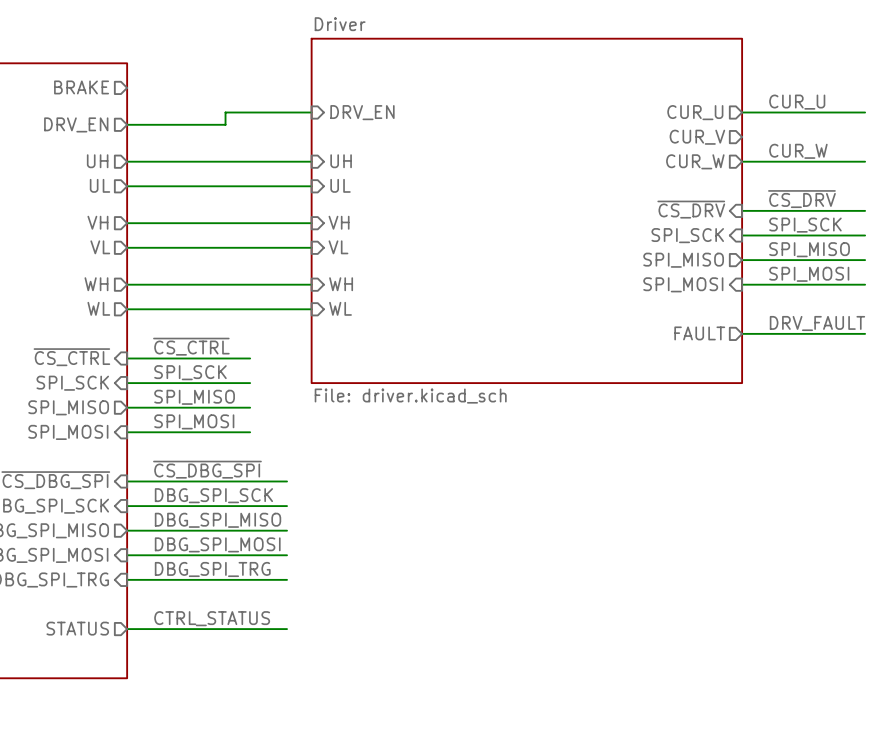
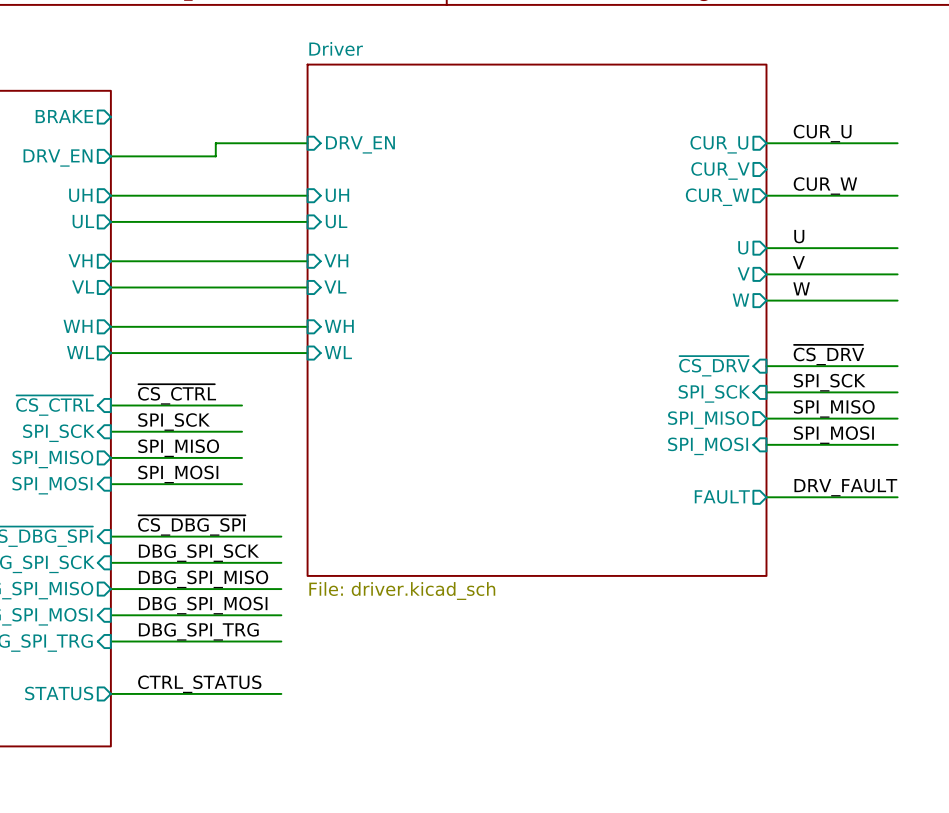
label: ~{CS_DRV} (801, 199) -> U (799, 236)
sheet pin shape: input (691, 209) -> output (743, 247)
sheet pin: ~{CS_DRV} (691, 209) -> U (743, 247)
sheet Driver: File: driver.kicad_sch (526, 210) -> none
label: SPI_SCK (805, 225) -> V (798, 262)
sheet pin shape: input (687, 235) -> output (743, 273)
sheet pin: SPI_SCK (687, 235) -> V (743, 273)
label: SPI_MISO (809, 249) -> W (801, 288)
sheet pin: SPI_MISO (683, 260) -> W (740, 300)
label position: SPI_MOSI (809, 274) -> SPI_MOSI (833, 435)
sheet Driver: none -> File: driver.kicad_sch (537, 320)
sheet pin position: SPI_MOSI (683, 284) -> SPI_MOSI (708, 446)
wire: (742, 284) (865, 284) -> (766, 366) (897, 366)
label: none -> ~{CS_DRV} (828, 355)
sheet pin: none -> ~{CS_DRV} (714, 366)
label position: DRV_FAULT (817, 323) -> DRV_FAULT (845, 487)
sheet pin position: FAULT (699, 333) -> FAULT (722, 496)
wire: (742, 333) (865, 333) -> (766, 418) (897, 418)
label: none -> SPI_SCK (829, 382)
sheet pin: none -> SPI_SCK (714, 393)
wire: none -> (766, 392) (897, 392)
label: none -> SPI_MISO (834, 408)
sheet pin: none -> SPI_MISO (708, 420)
wire: none -> (766, 444) (897, 444)
wire: none -> (766, 497) (897, 497)

